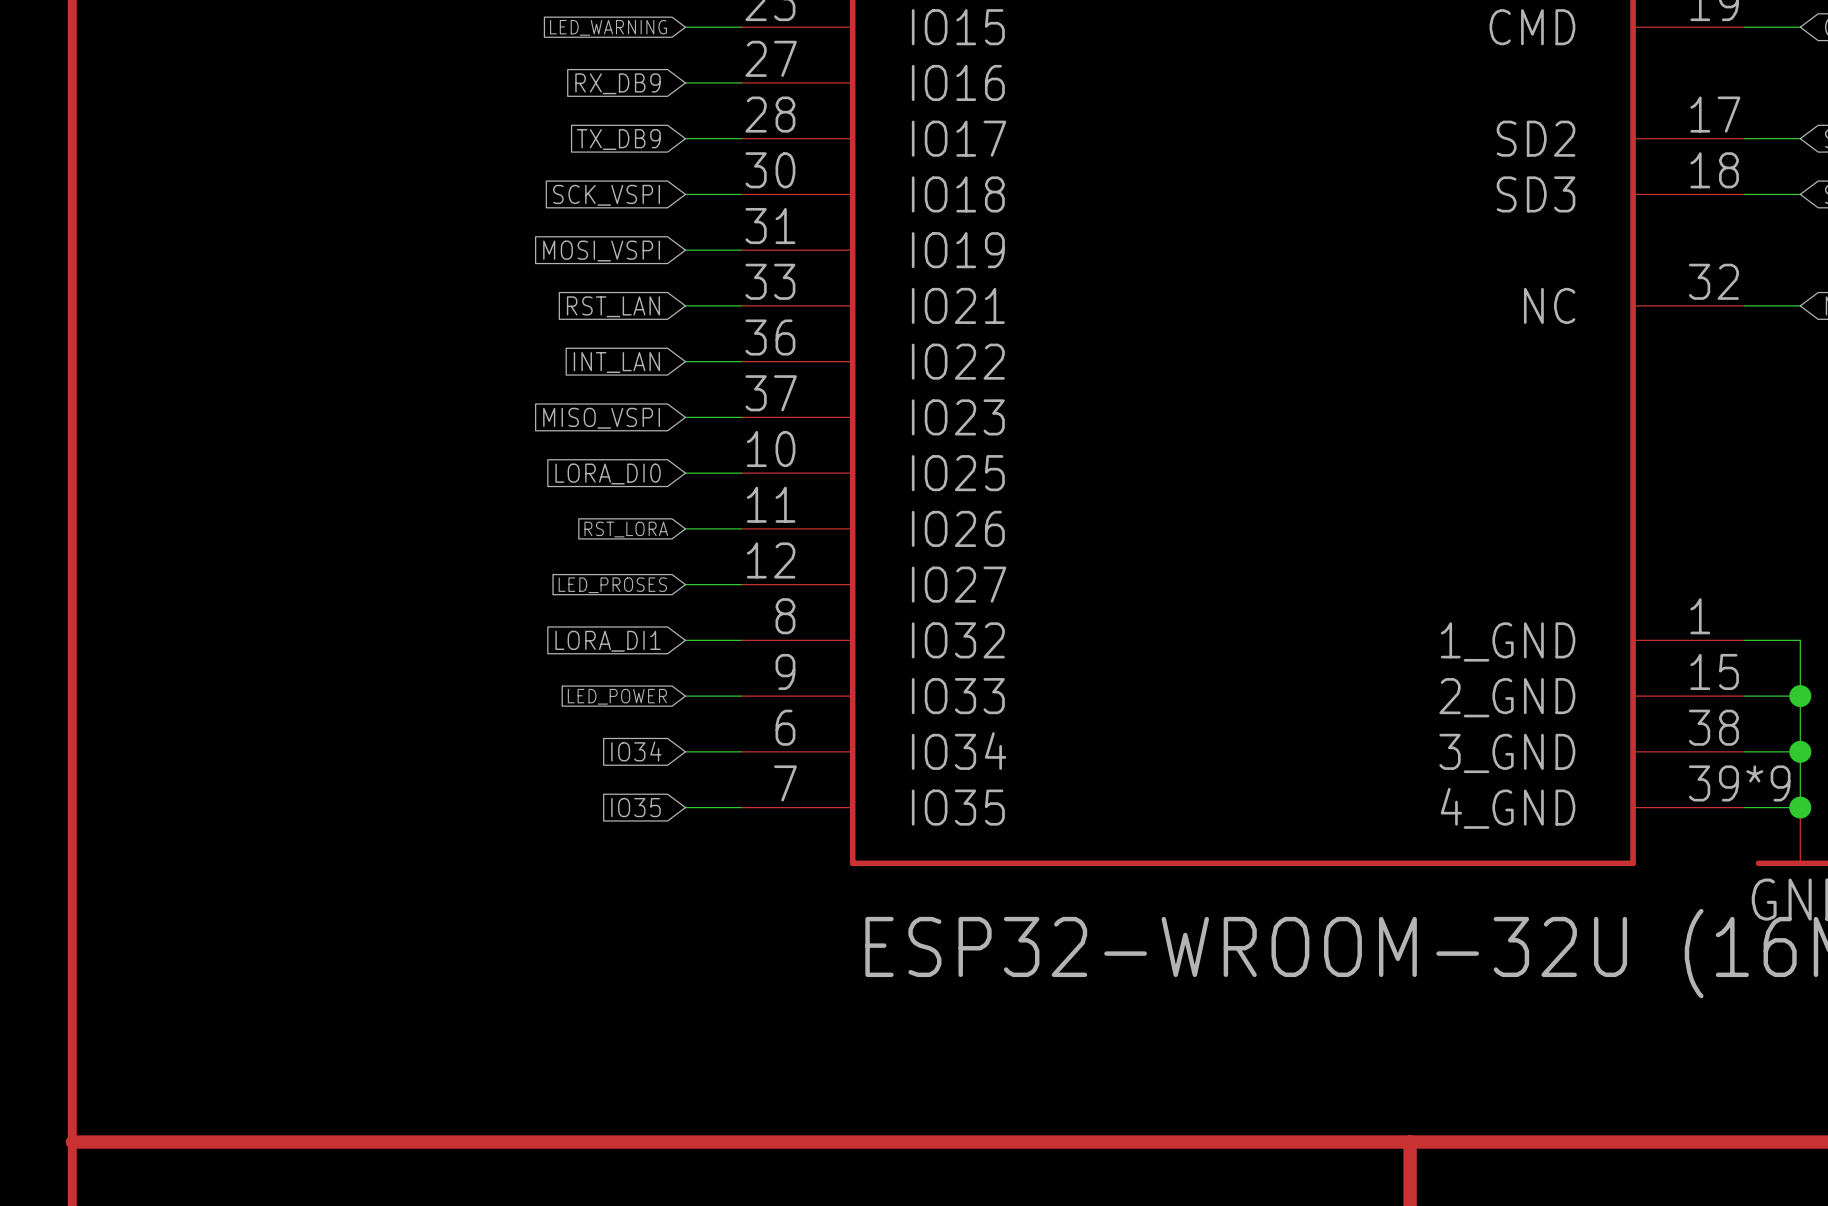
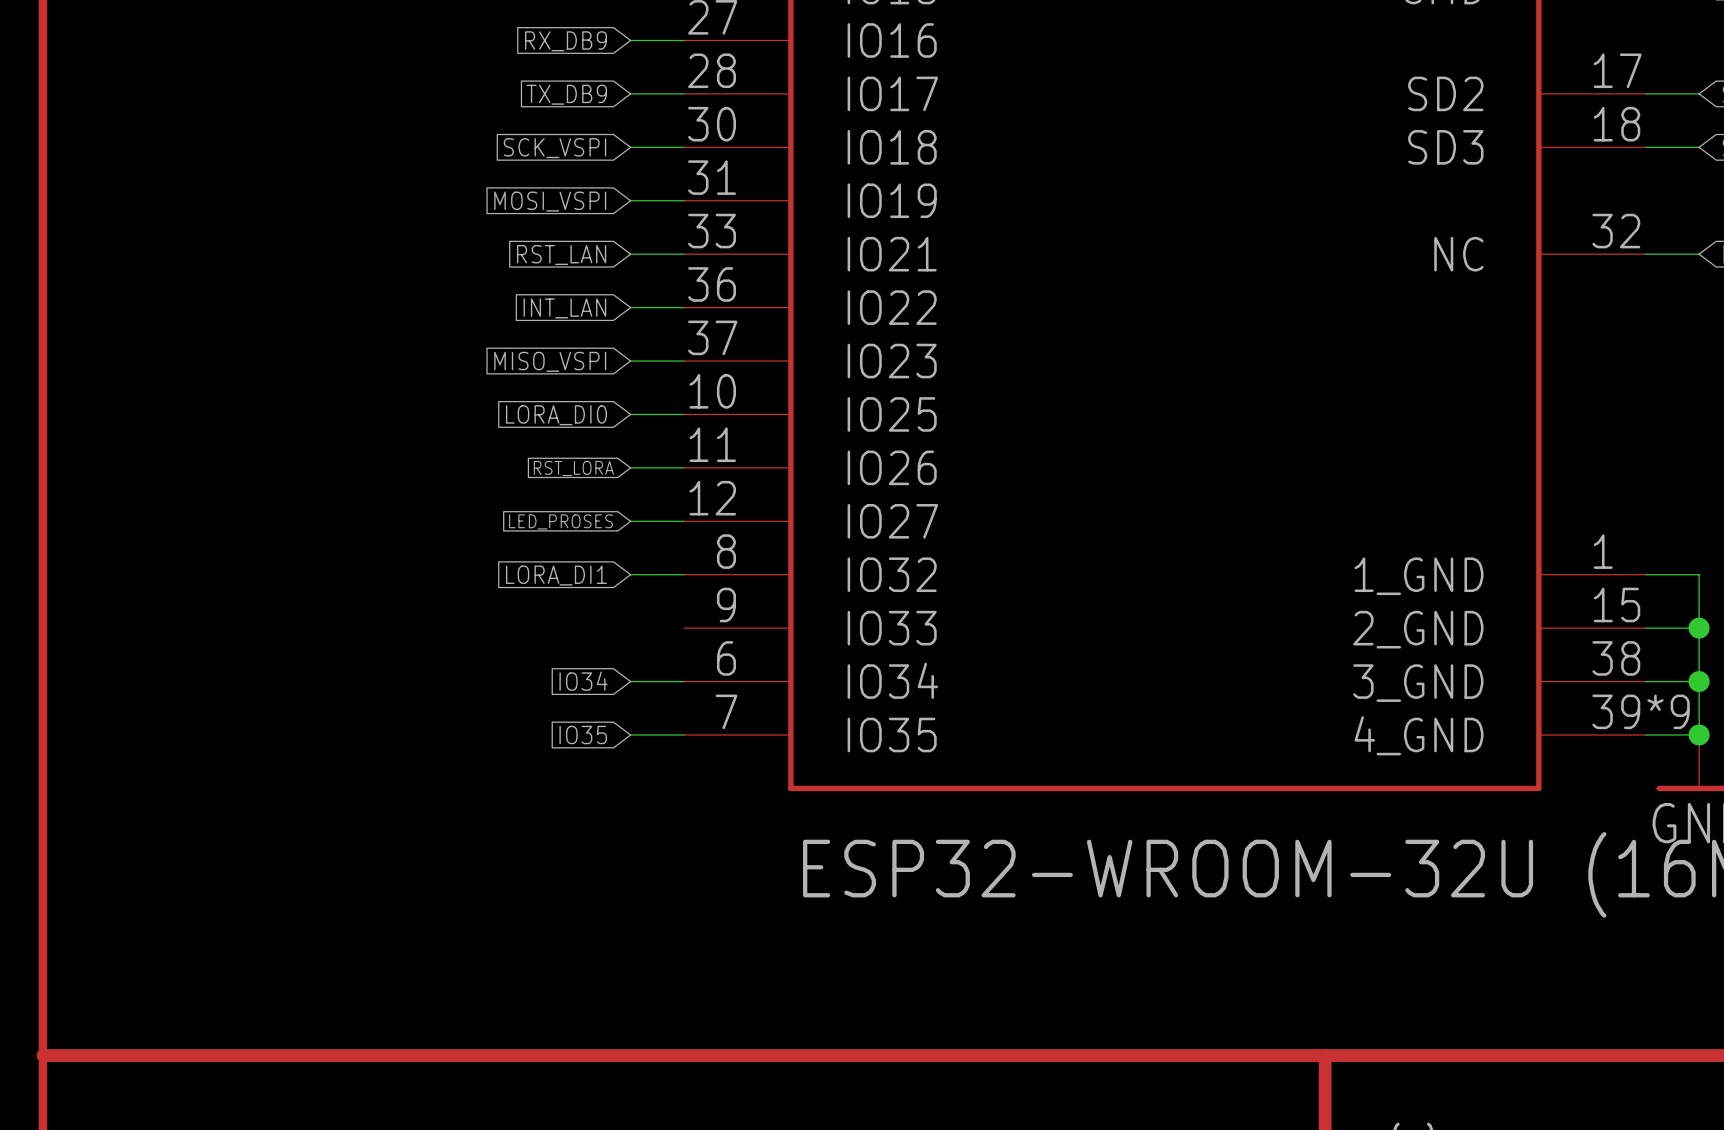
global label: LED_POWER (617, 696) -> none
wire: (685, 696) (741, 696) -> none

